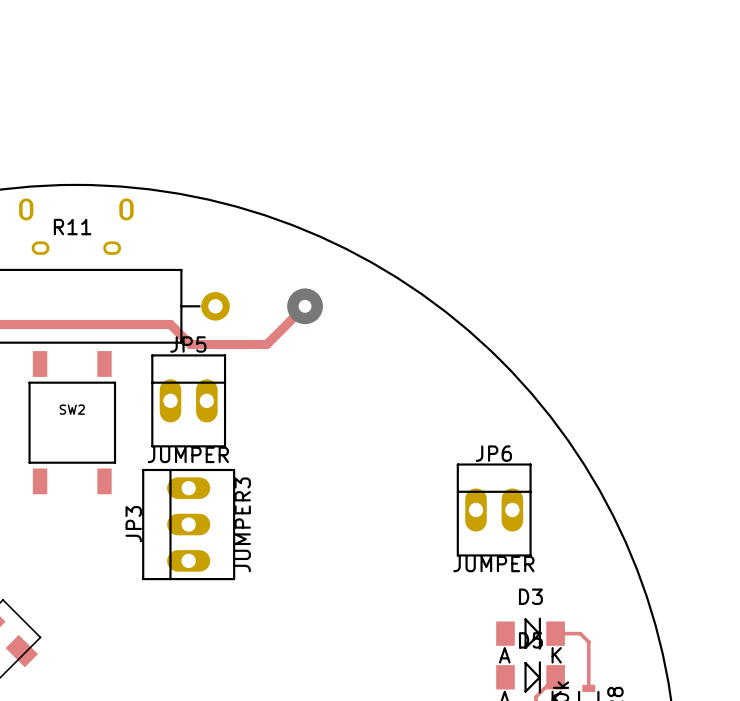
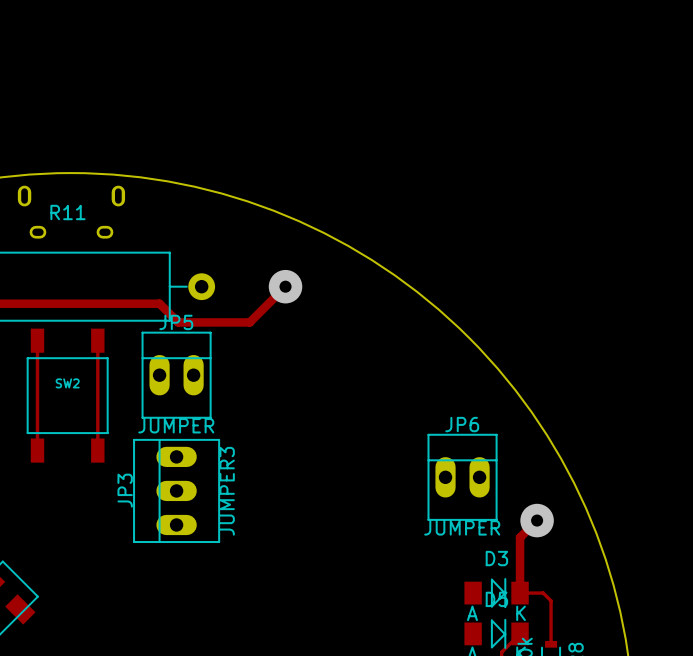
track: none -> (37, 340) (37, 450)
track: none -> (97, 340) (97, 450)
track: none -> (537, 520) (520, 537) (520, 593)
via: none -> (537, 520)

